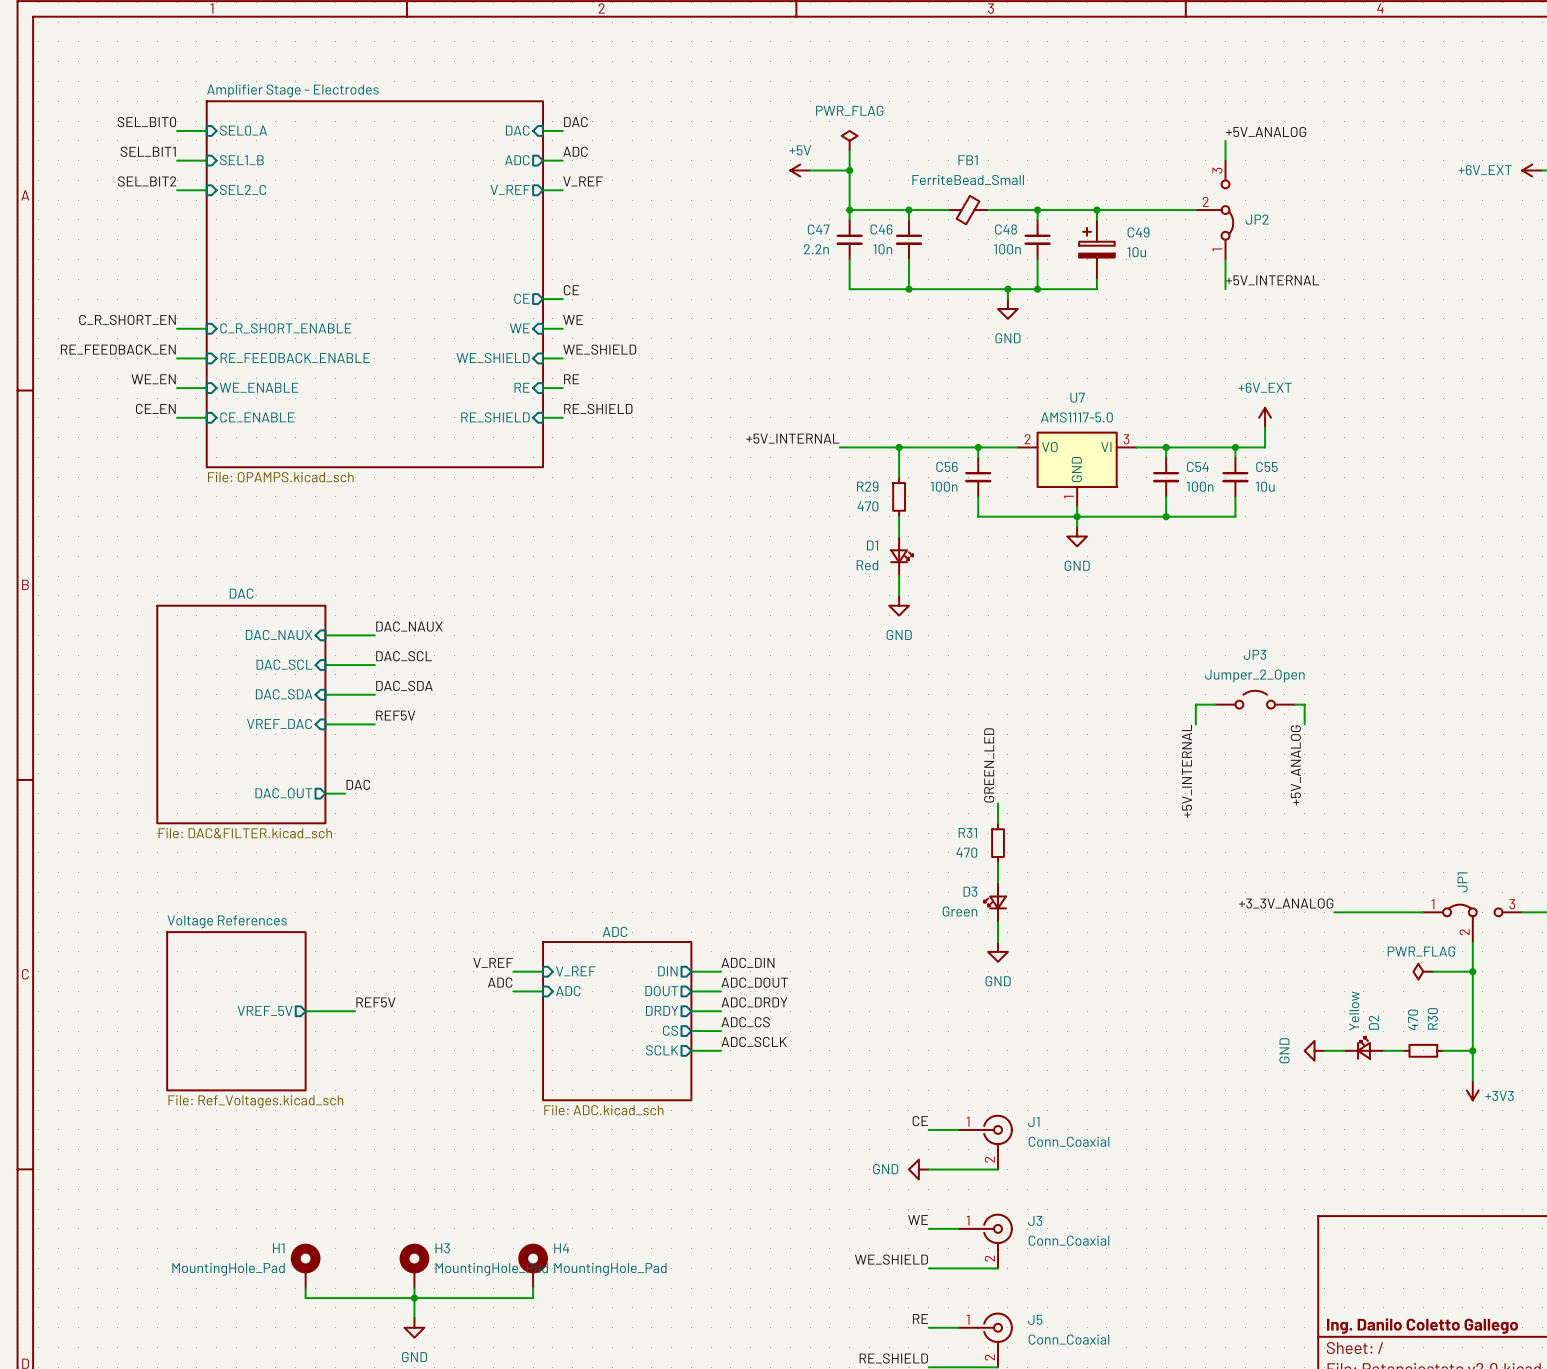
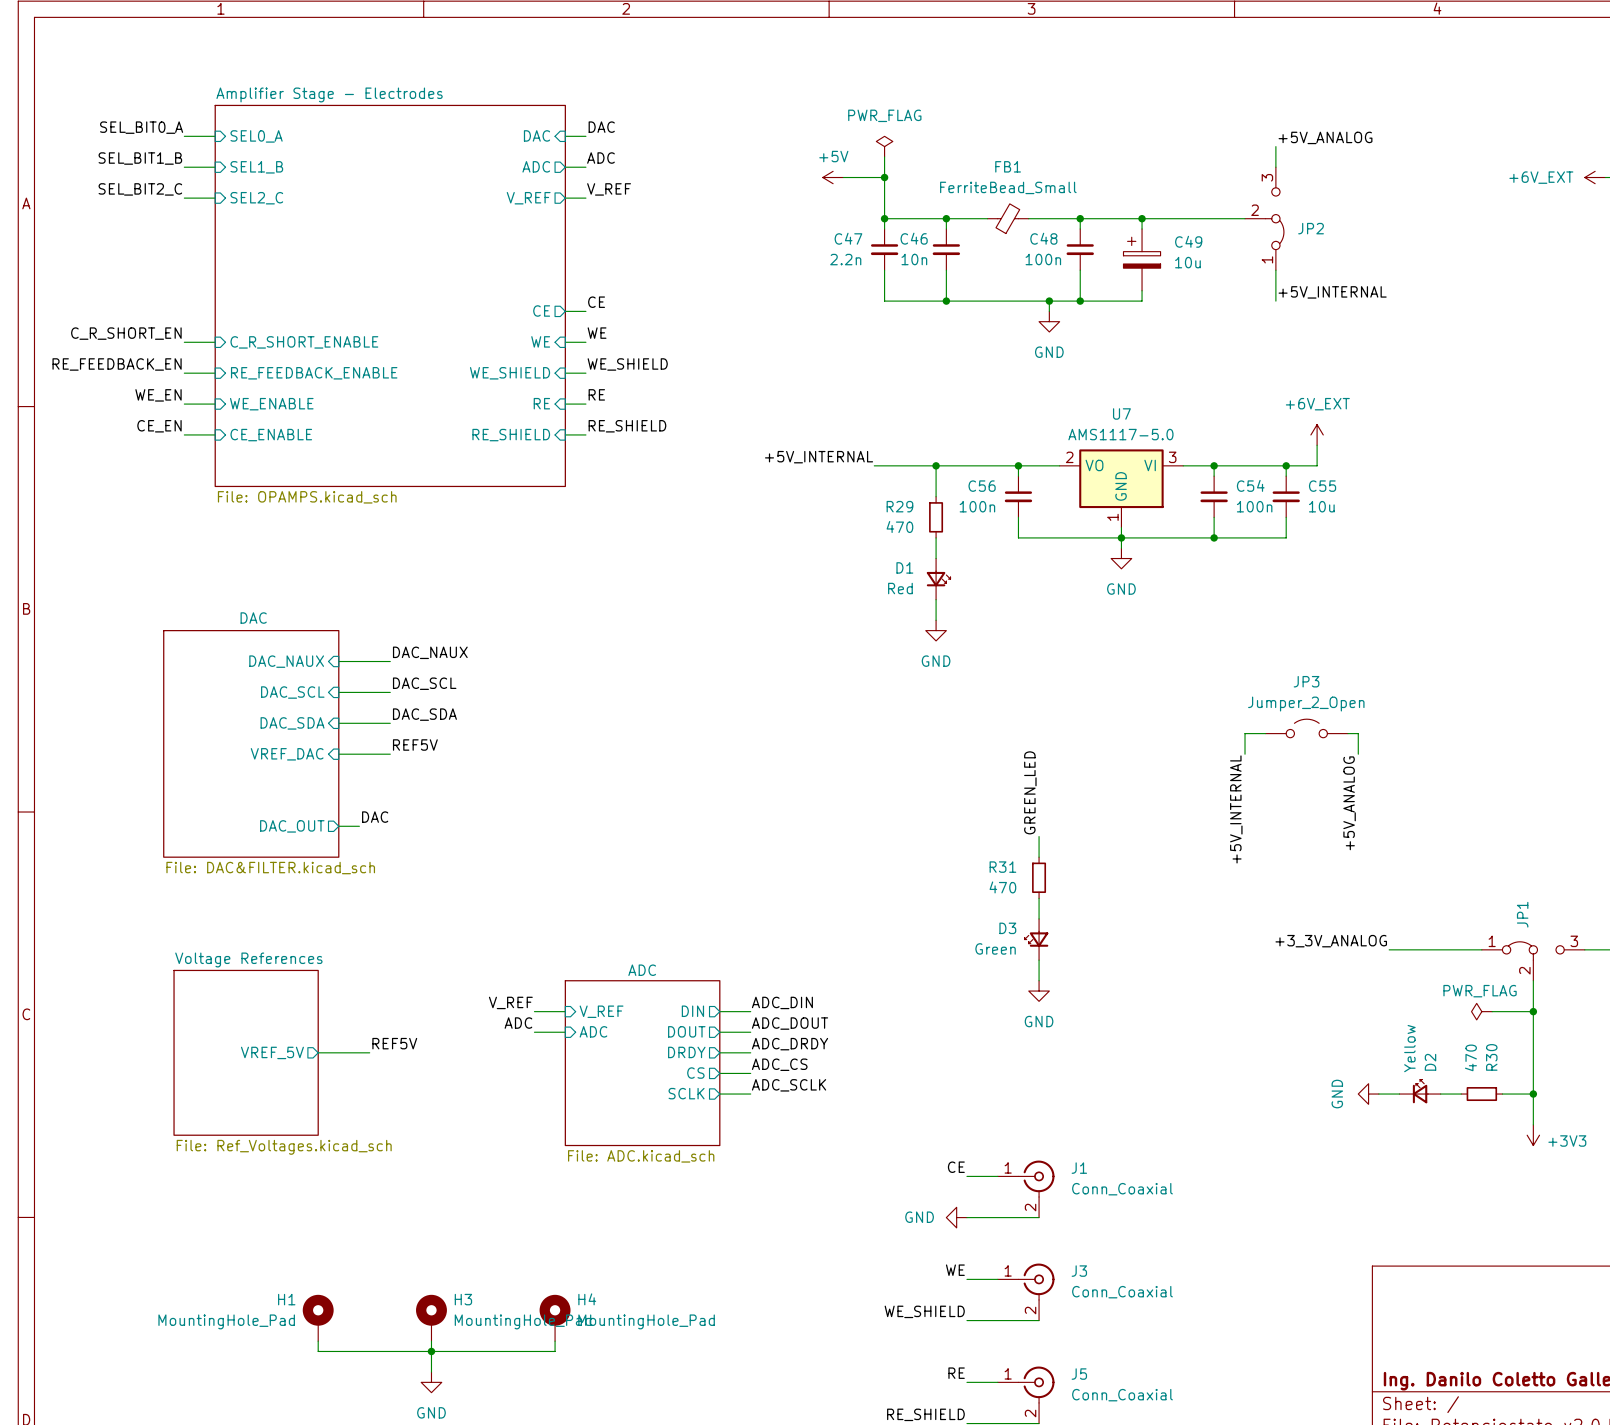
label: SEL_BIT0 (146, 122) -> SEL_BIT0_A (141, 127)
label: SEL_BIT1 (148, 151) -> SEL_BIT1_B (140, 158)
label: SEL_BIT2 (147, 181) -> SEL_BIT2_C (140, 189)

